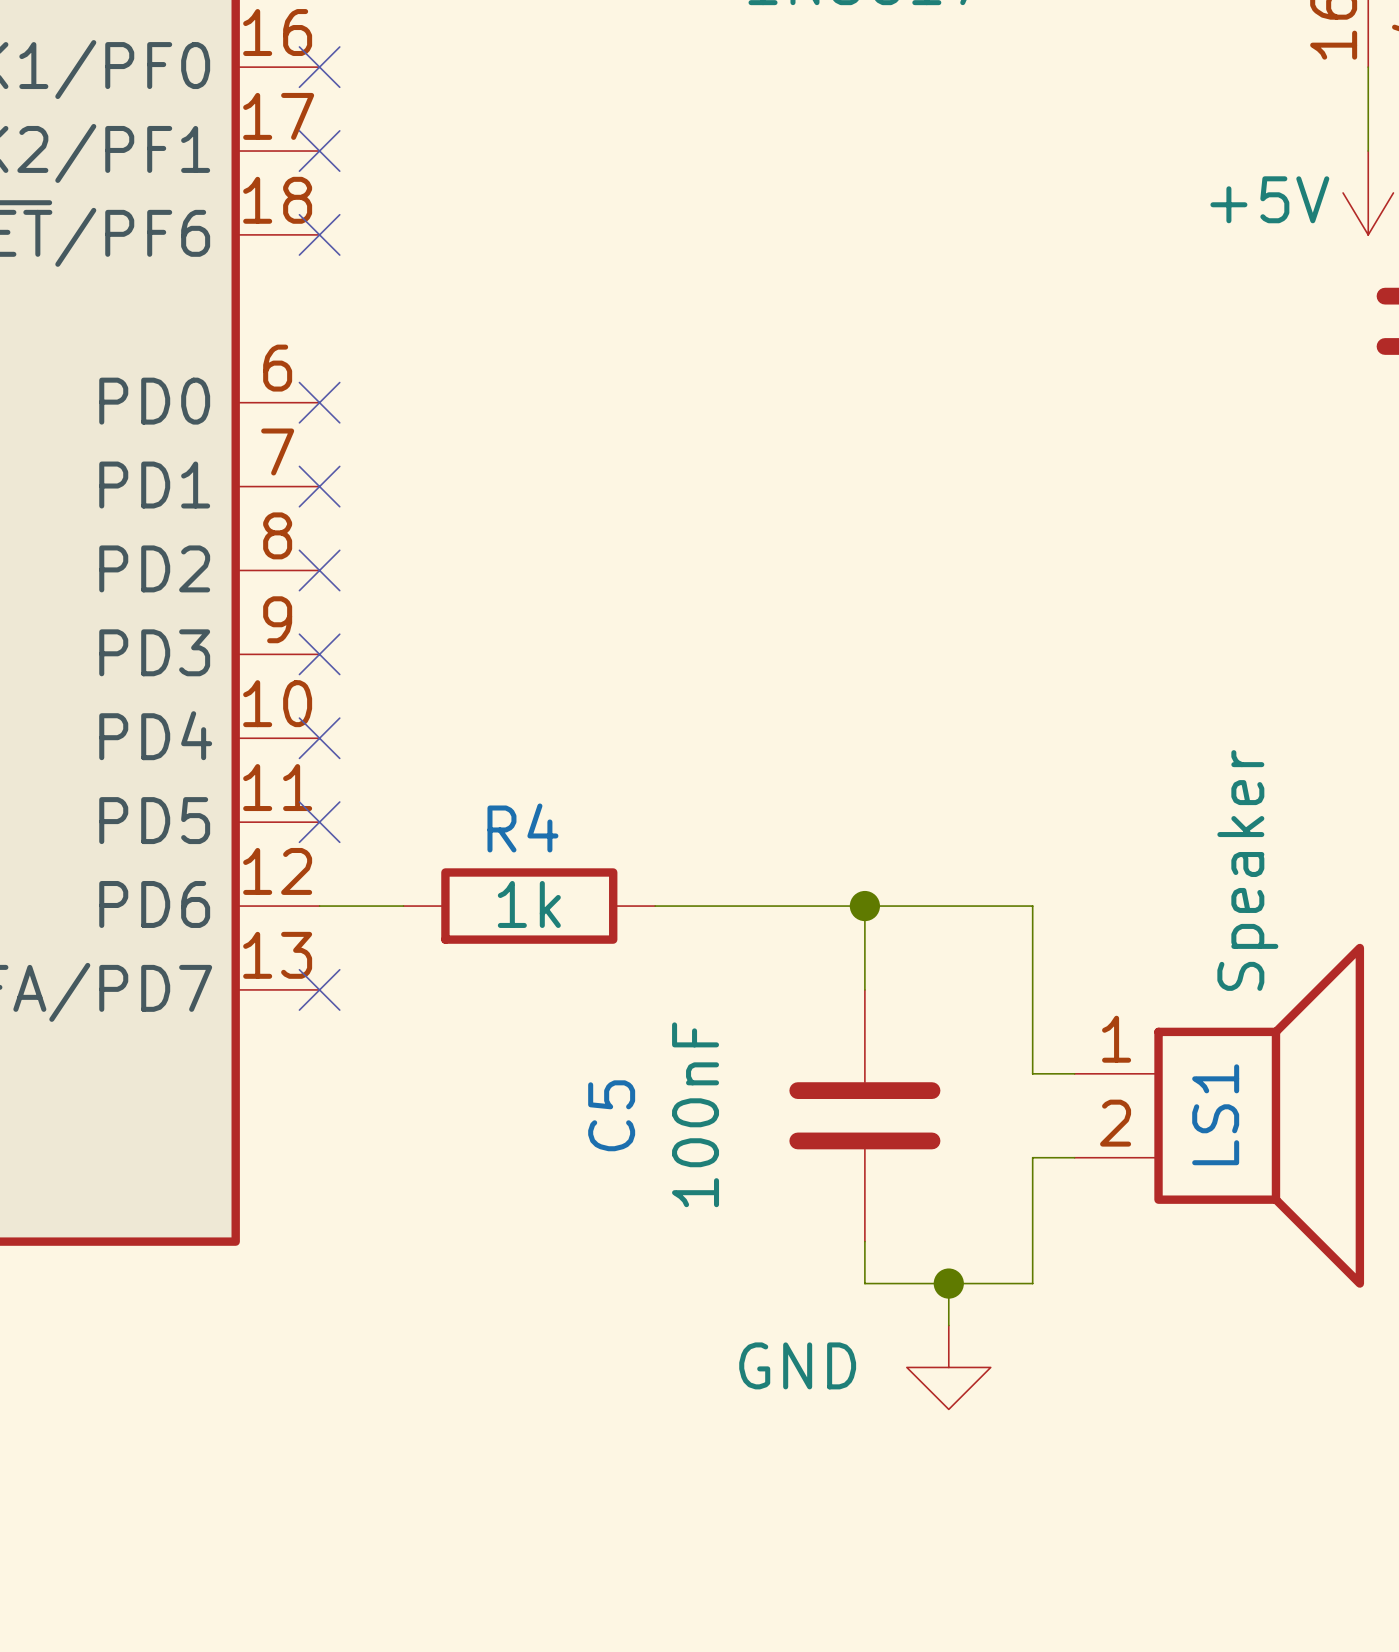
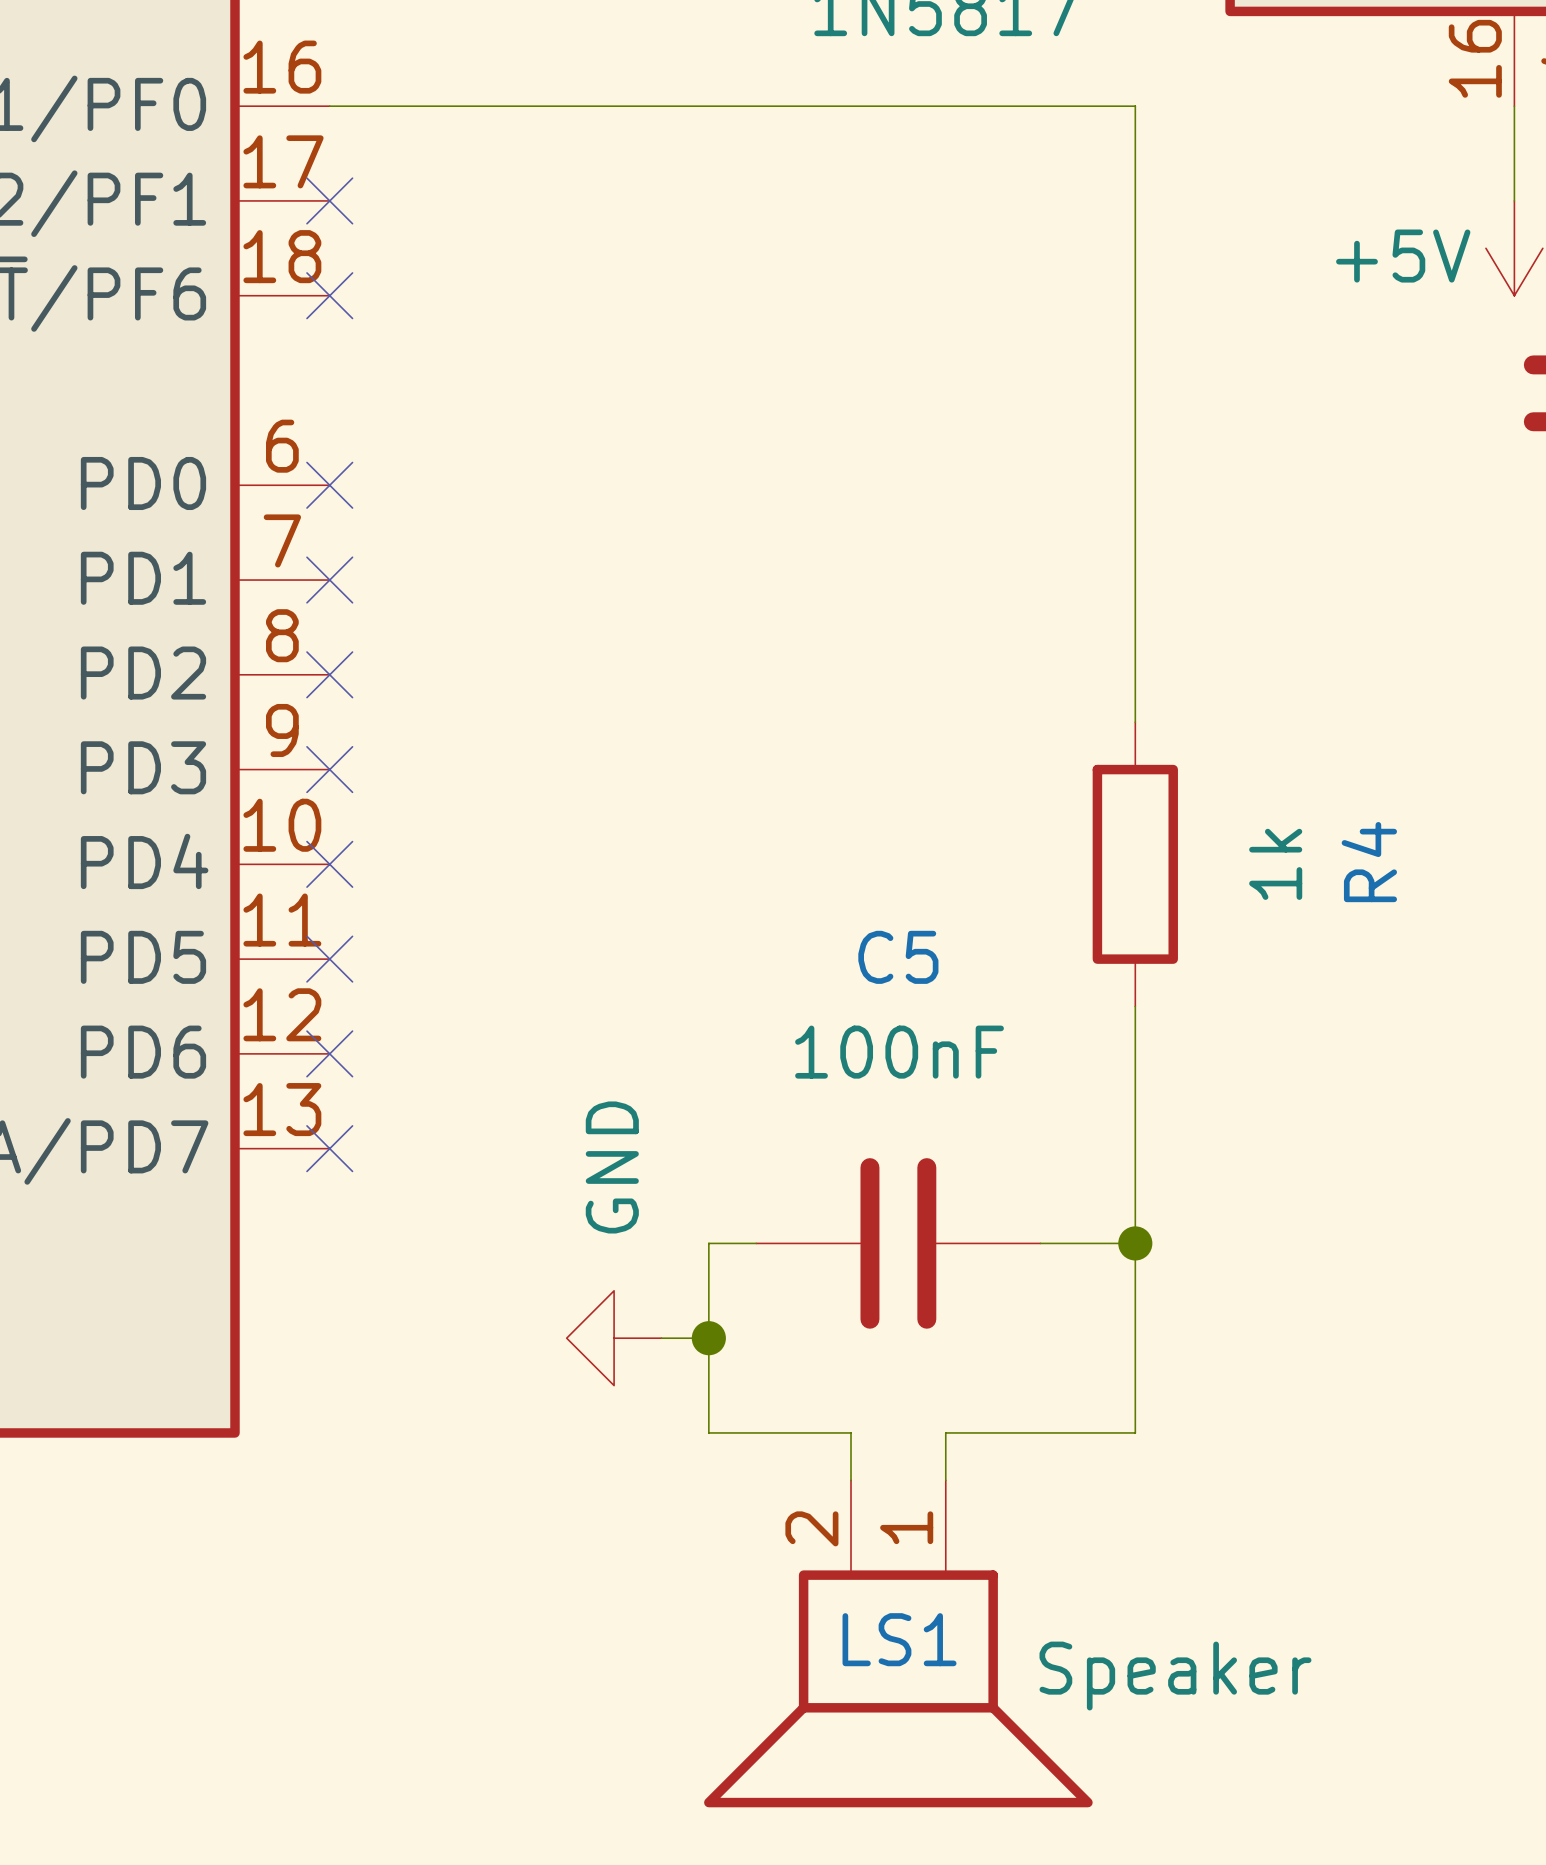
wire: none -> (329, 106) (1135, 106) (1135, 722)
no-connect mark: (319, 67) -> none
R4 name position: R4 (522, 827) -> R4 (1369, 862)
R4 value position: 1k (529, 904) -> 1k (1275, 864)
wire: (319, 906) (403, 906) -> none
no-connect mark: none -> (329, 1053)
R4 rotation: 0° (529, 906) -> 90° clockwise (1135, 864)
R4 position: (529, 906) -> (1135, 864)
wire: (655, 906) (1032, 906) -> (1135, 1006) (1135, 1053)
wire: (864, 906) (864, 989) -> none
junction: (864, 906) -> none
wire: none -> (756, 1243) (708, 1243) (708, 1432) (851, 1432) (851, 1480)
wire: (1032, 1073) (1074, 1073) -> (661, 1338) (708, 1338)
junction: none -> (1135, 1243)
C5 rotation: 0° (864, 1115) -> 90° clockwise (898, 1243)
LS1 position: (1219, 1115) -> (898, 1643)
LS1 rotation: 0° (1259, 1115) -> 90° clockwise (898, 1688)
junction: none -> (708, 1338)
wire: (1032, 1157) (1074, 1157) -> (1135, 1338) (1135, 1243) (1040, 1243)
wire: (1032, 1241) (1032, 1283) (864, 1283) -> (1135, 1432) (945, 1432)
wire: (948, 1283) (948, 1325) -> none
junction: (948, 1283) -> none
power symbol rotation: 0° (948, 1367) -> 90° clockwise (614, 1338)
power symbol position: GND (948, 1367) -> GND (614, 1338)

